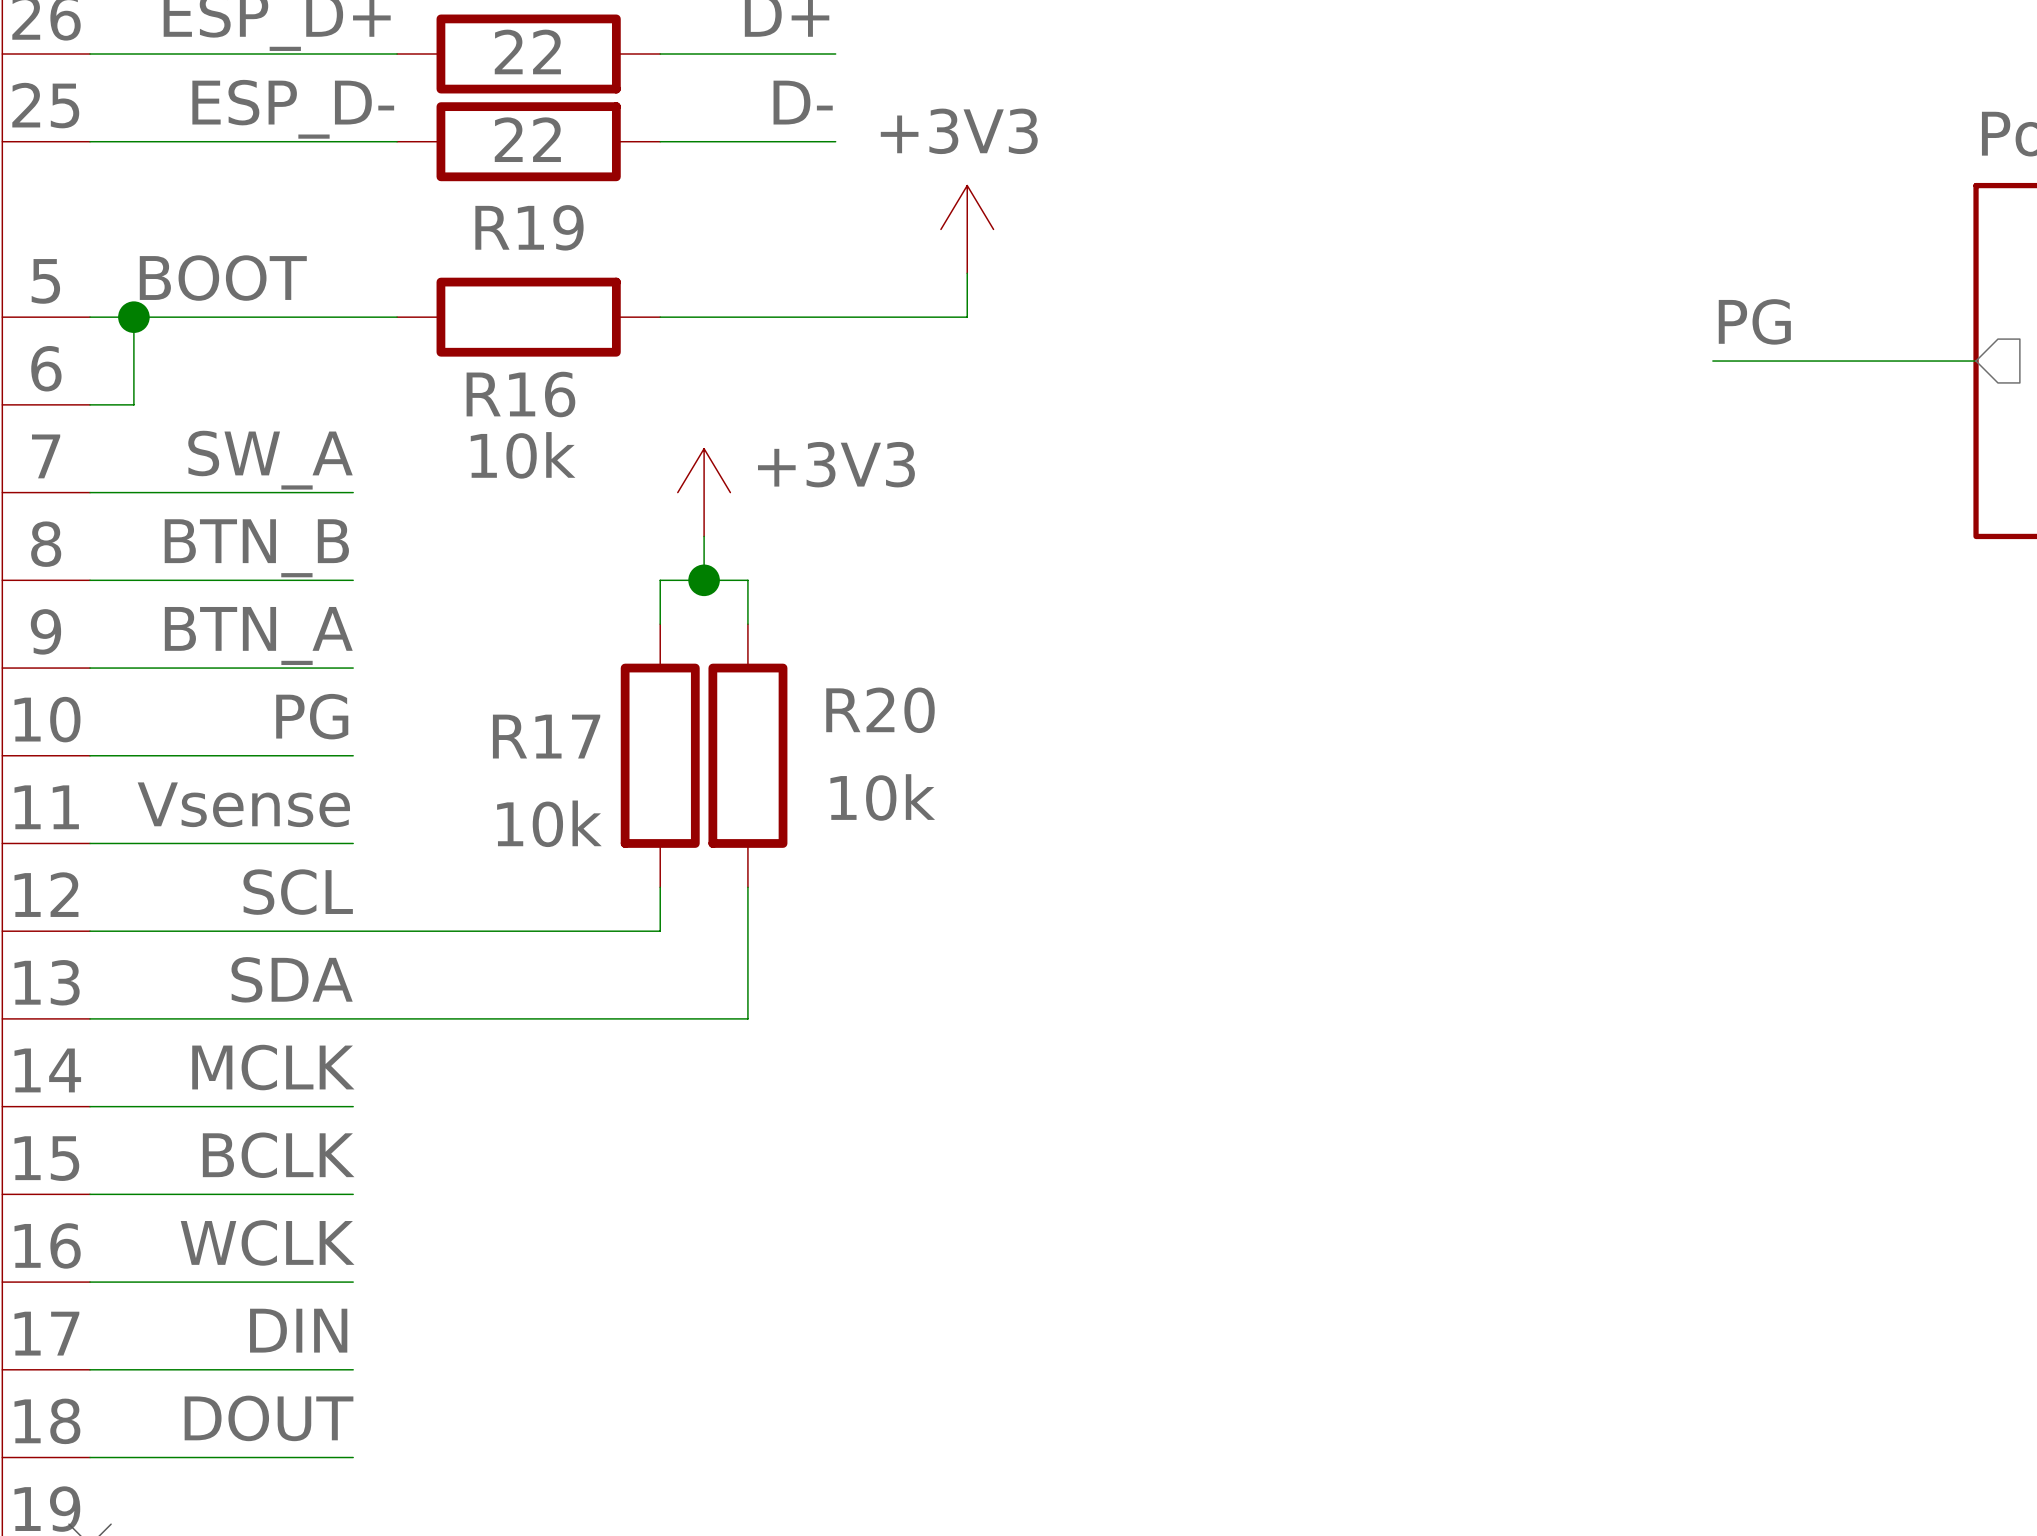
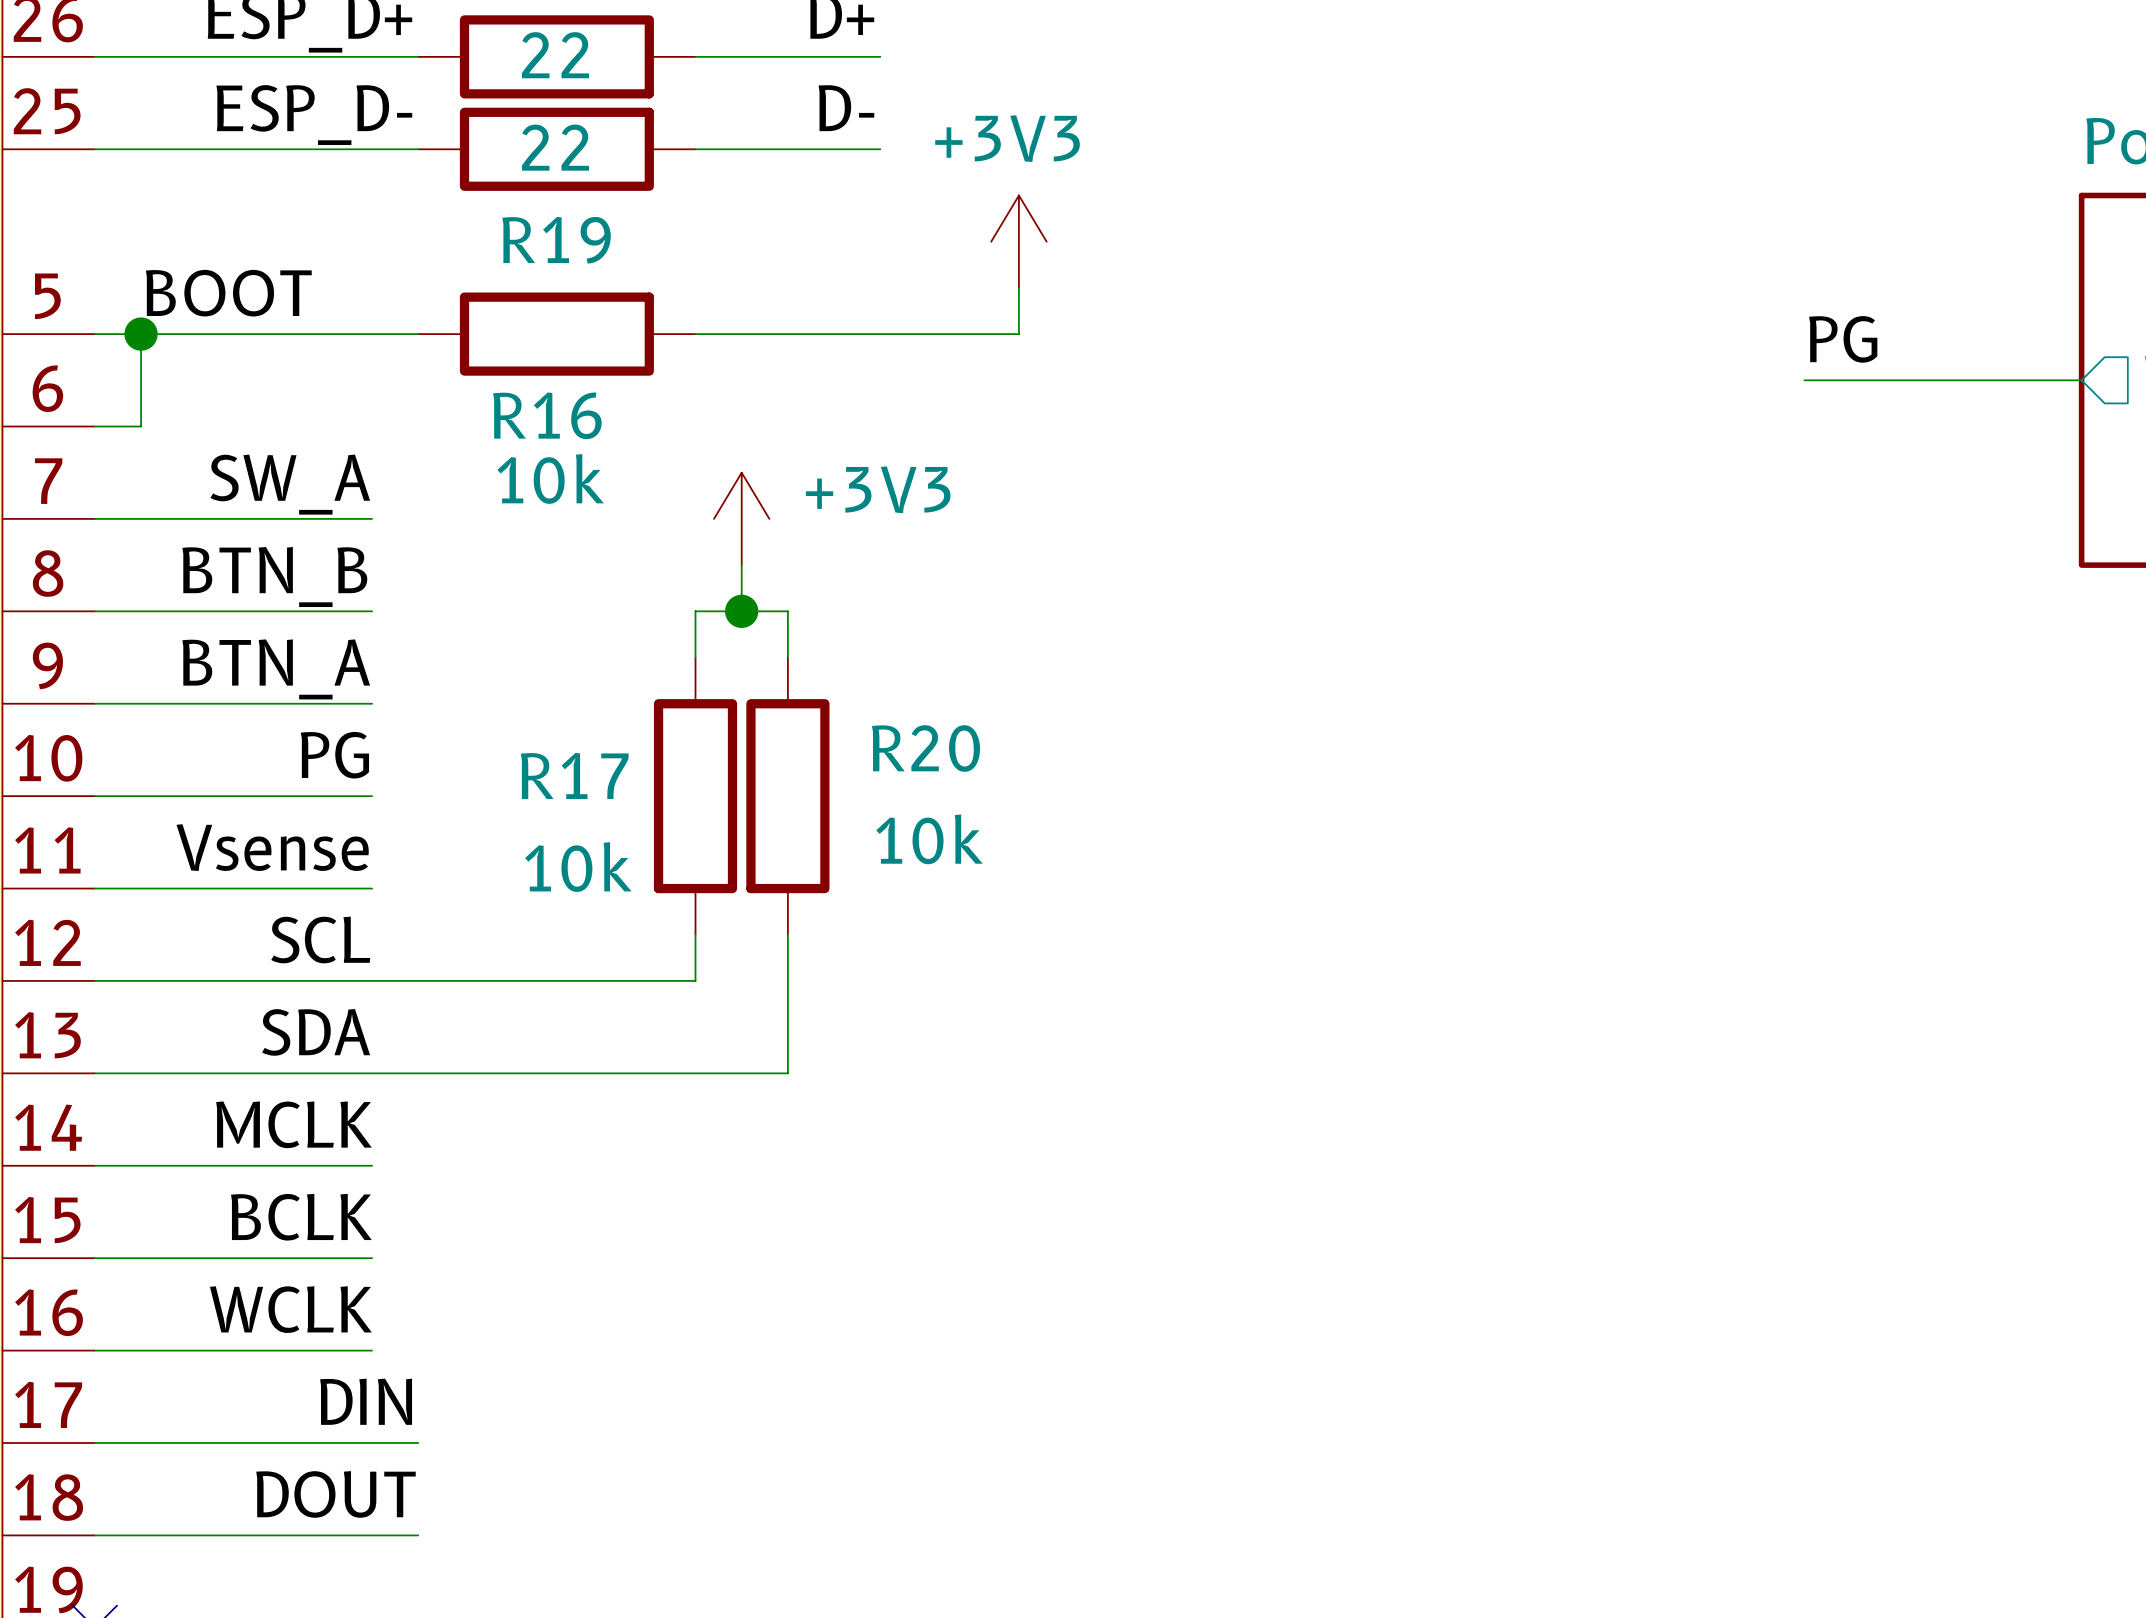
label position: DIN (298, 1330) -> DIN (366, 1401)
wire: none -> (372, 1442) (418, 1442)
label position: DOUT (269, 1418) -> DOUT (335, 1494)
wire: none -> (372, 1535) (418, 1535)

